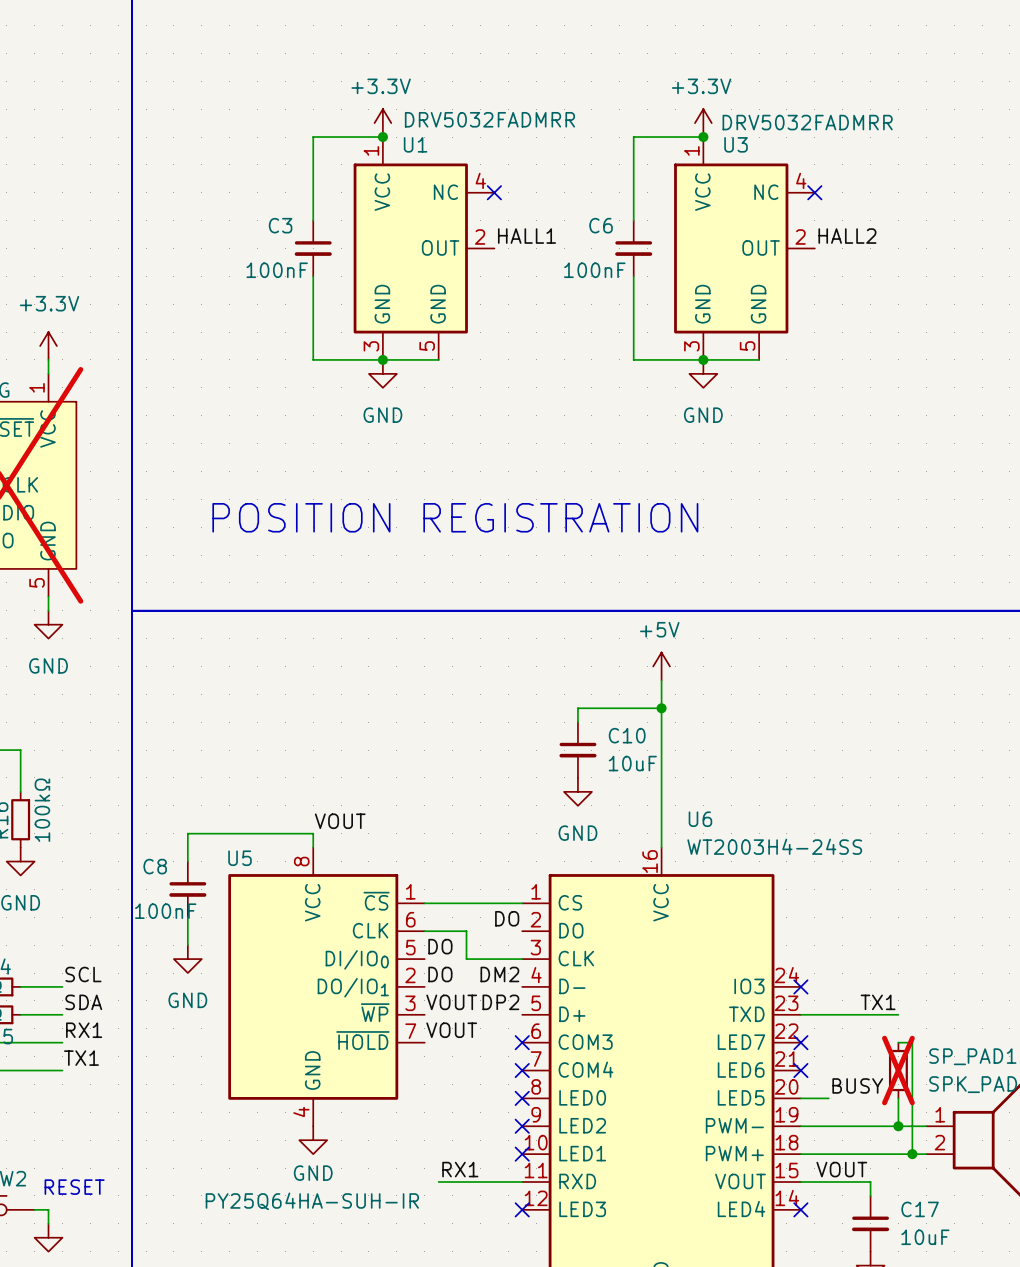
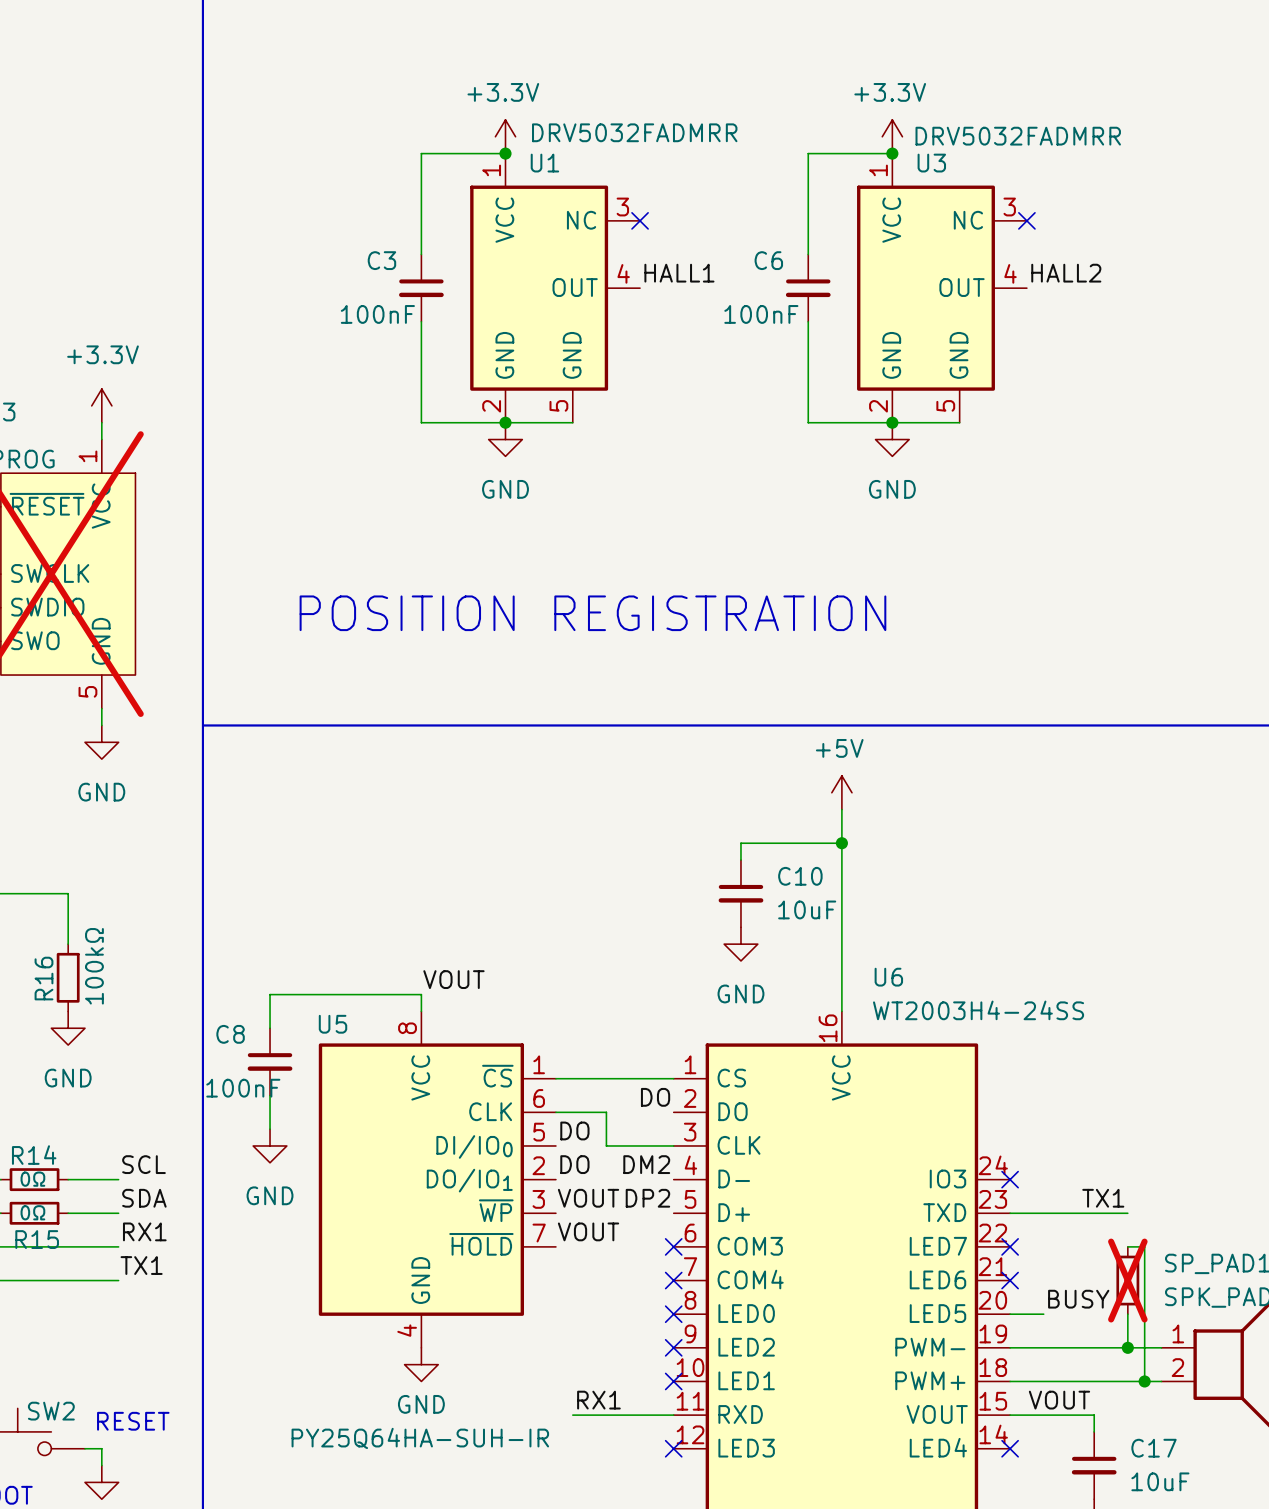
U1 pin number: 4 (480, 180) -> 3 (622, 207)
U3 pin number: 4 (801, 180) -> 3 (1009, 207)
U1 pin number: 2 (480, 236) -> 4 (623, 273)
U3 pin number: 2 (800, 236) -> 4 (1010, 273)
U1 pin number: 3 (371, 346) -> 2 (491, 406)
U3 pin number: 3 (691, 346) -> 2 (878, 406)

